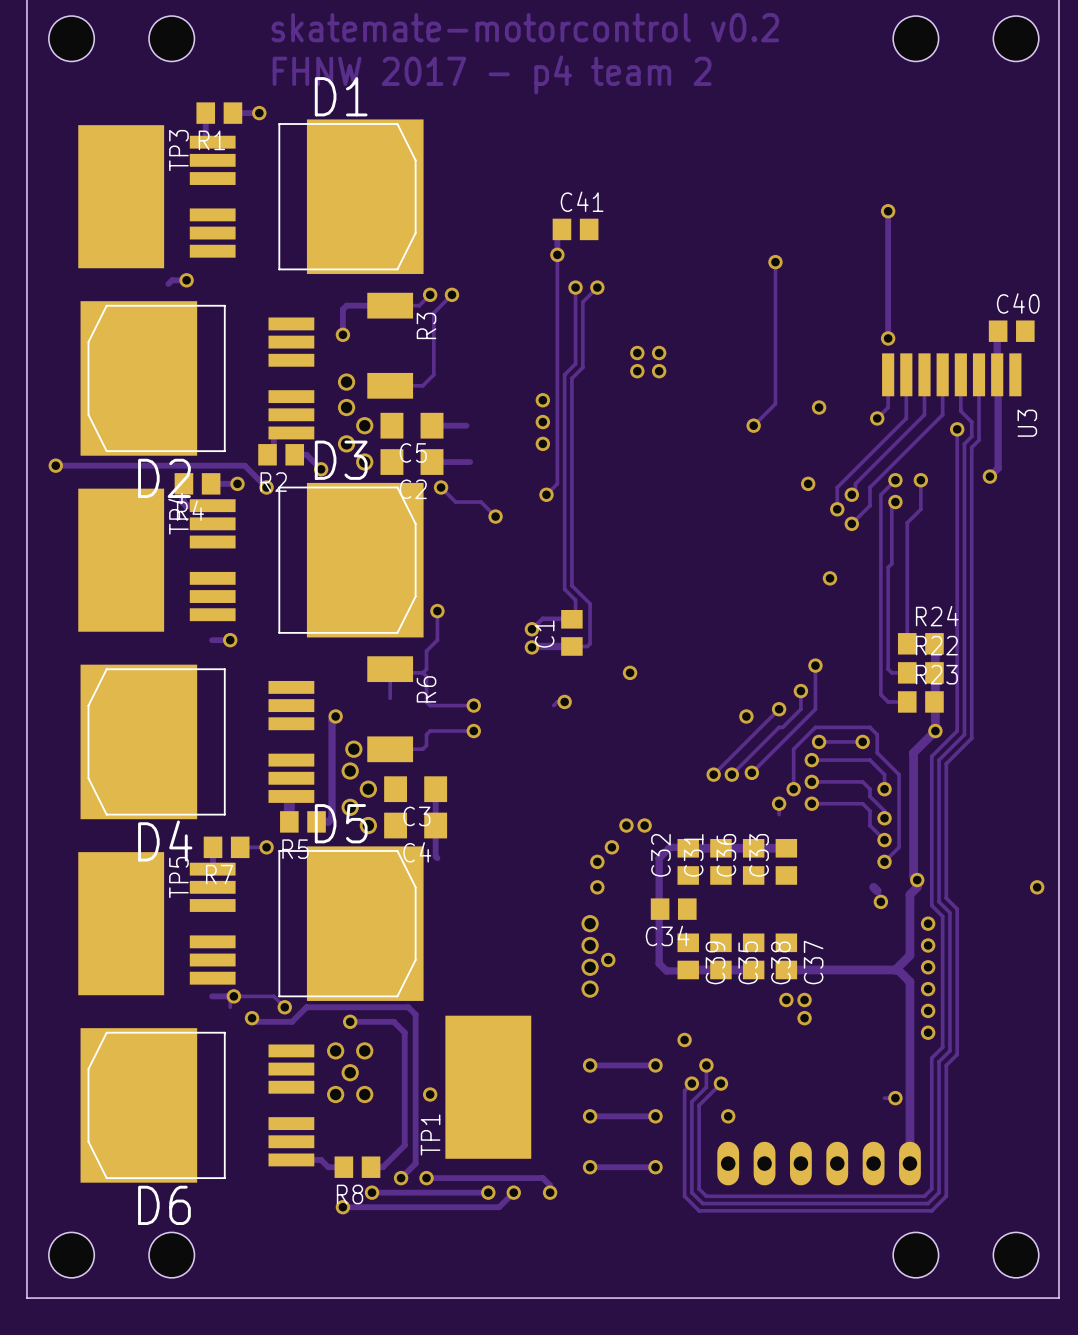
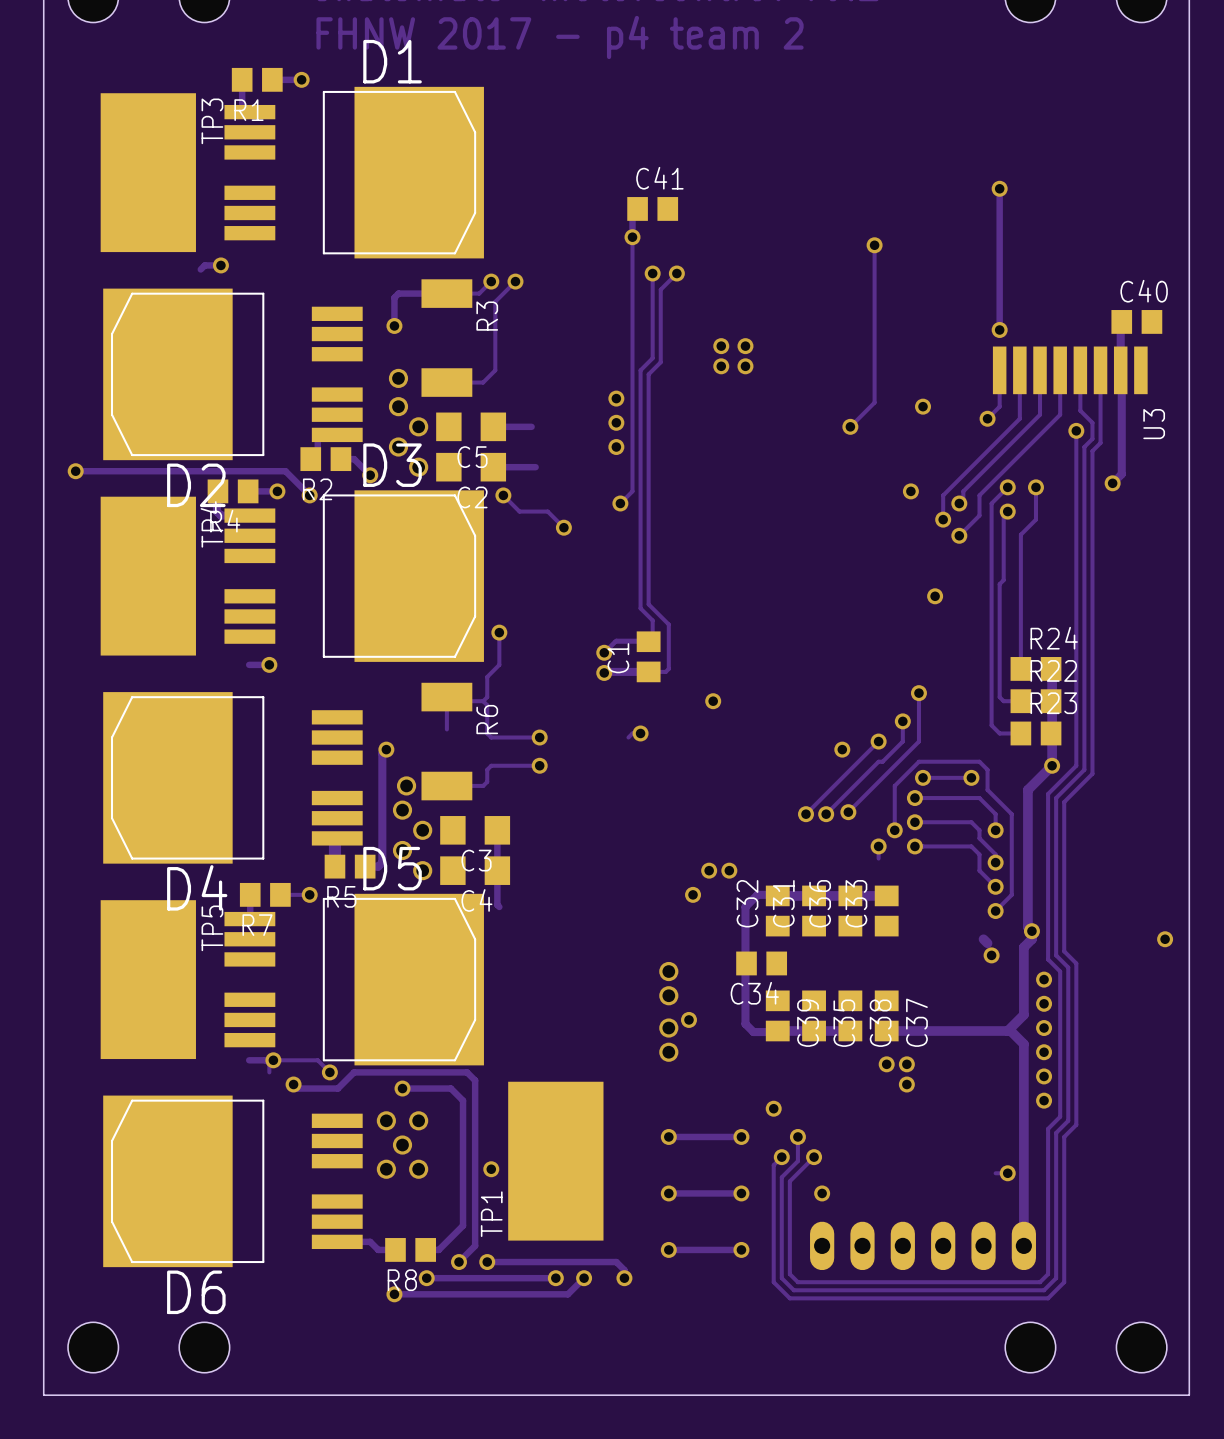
via: (597, 861) -> none
via: (597, 887) -> none
via: none -> (668, 971)
via: (590, 923) -> none
via: none -> (668, 995)
via: (590, 945) -> none

